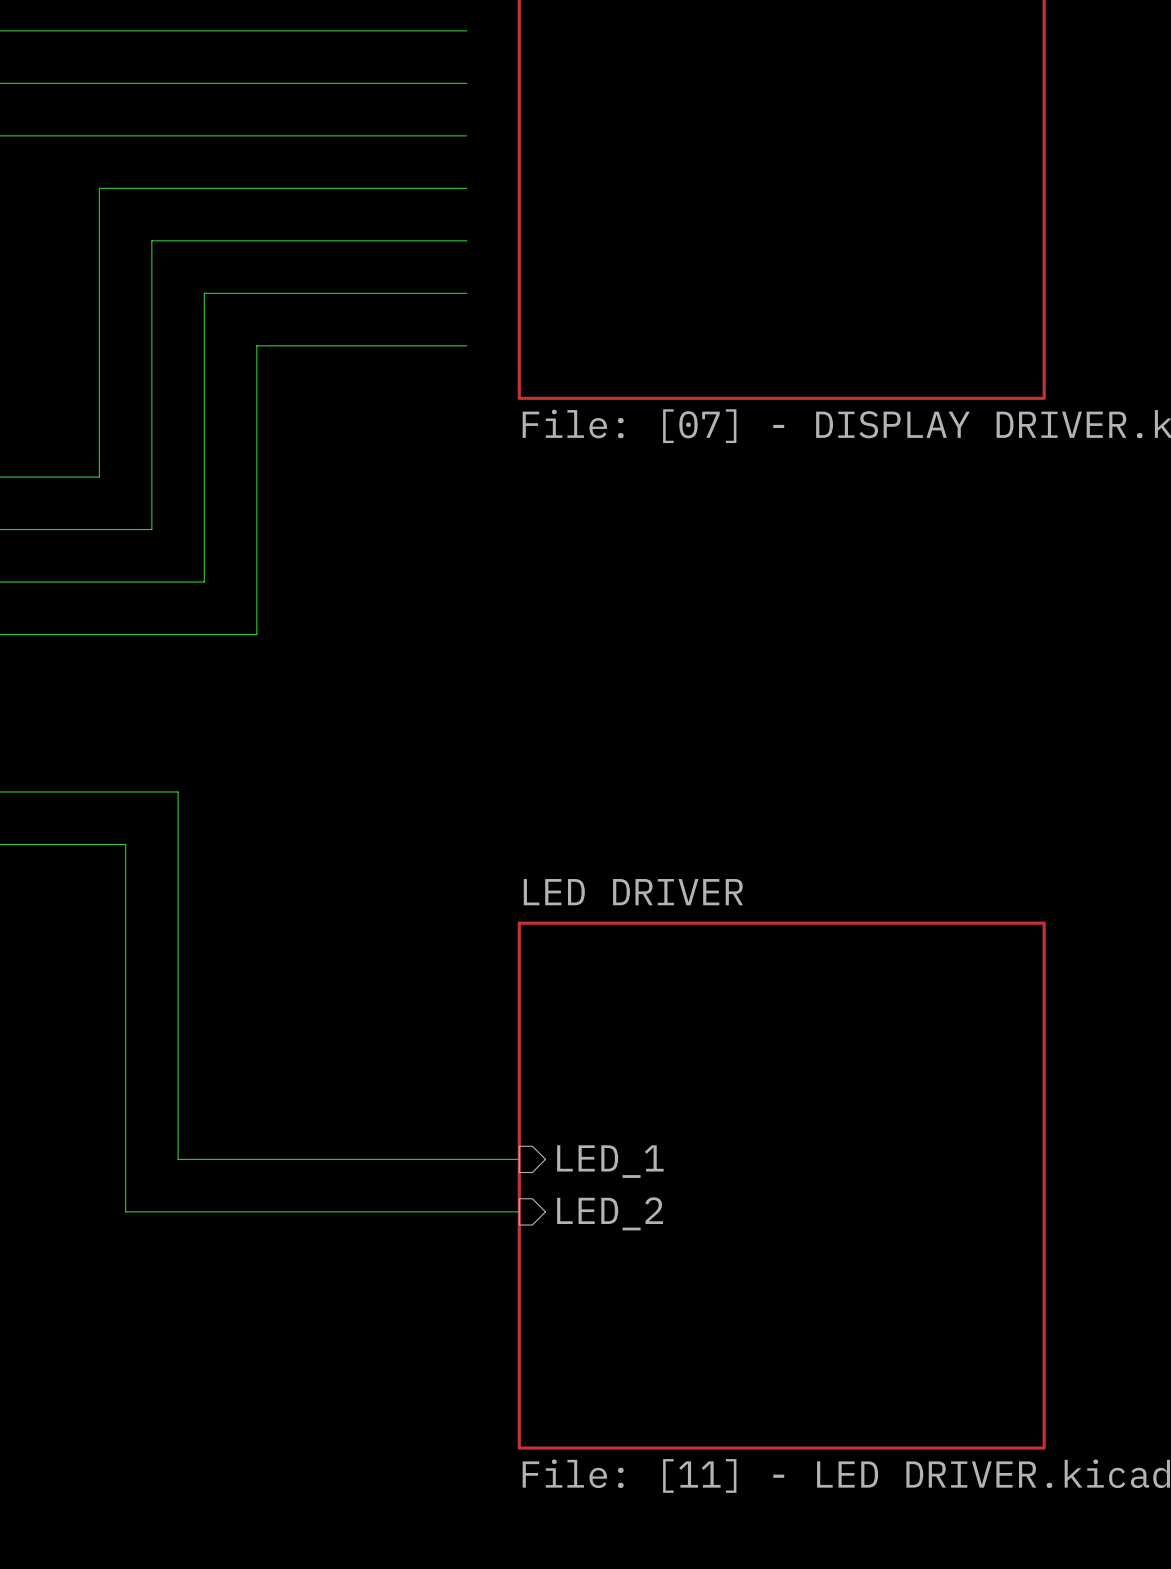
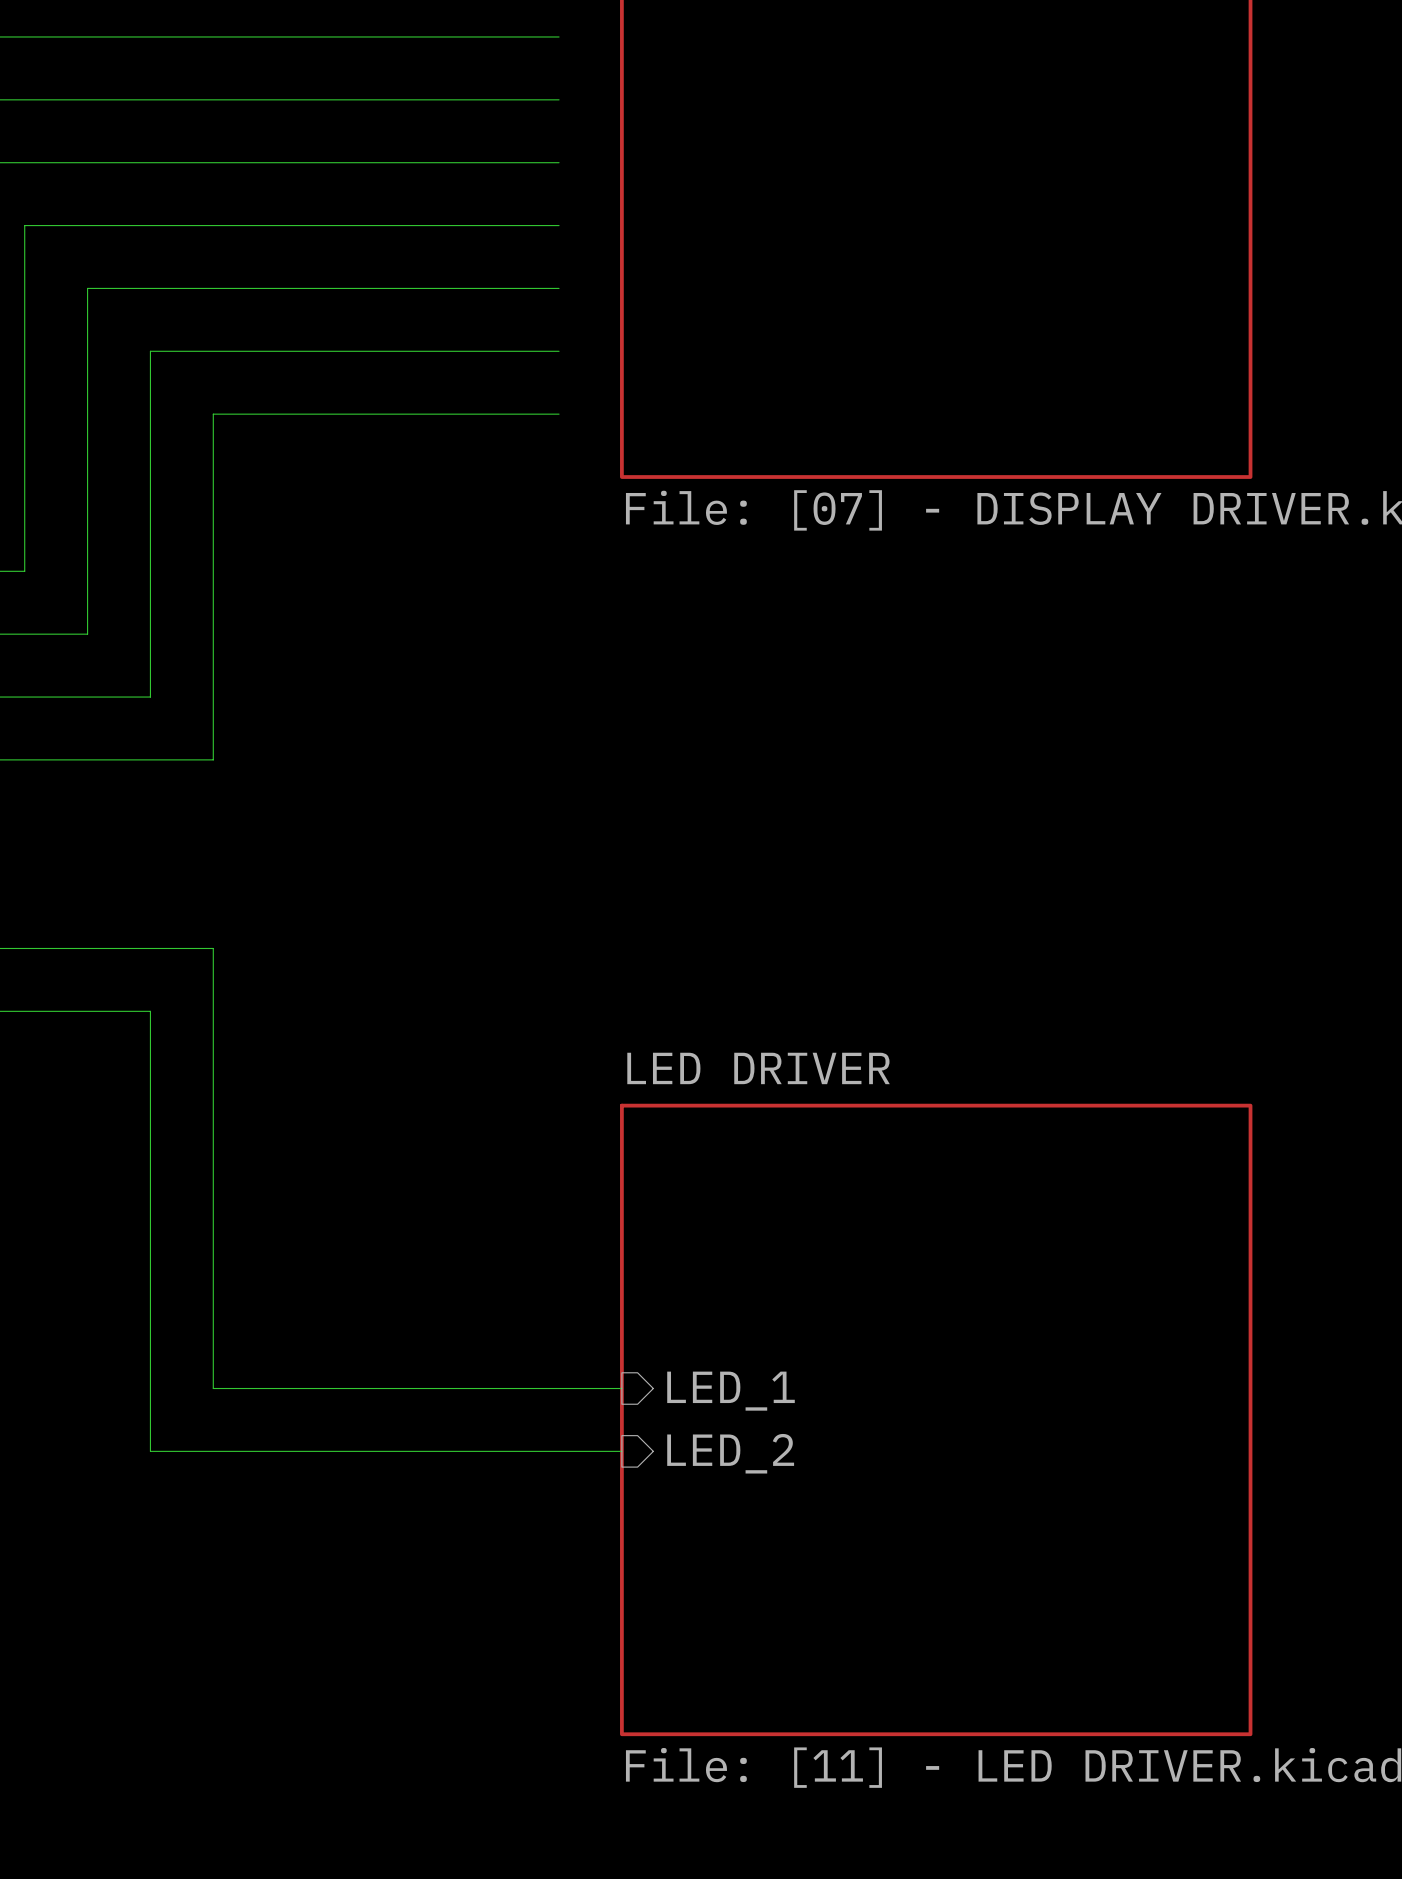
wire: (99, 188) (99, 477) (20, 477) -> (119, 225) (24, 225) (24, 571)
wire: (151, 240) (151, 529) (73, 529) -> (181, 288) (87, 288) (87, 634)
wire: (204, 293) (204, 582) (125, 582) -> (244, 351) (150, 351) (150, 697)
wire: (256, 345) (256, 634) (178, 634) -> (307, 414) (213, 414) (213, 759)

